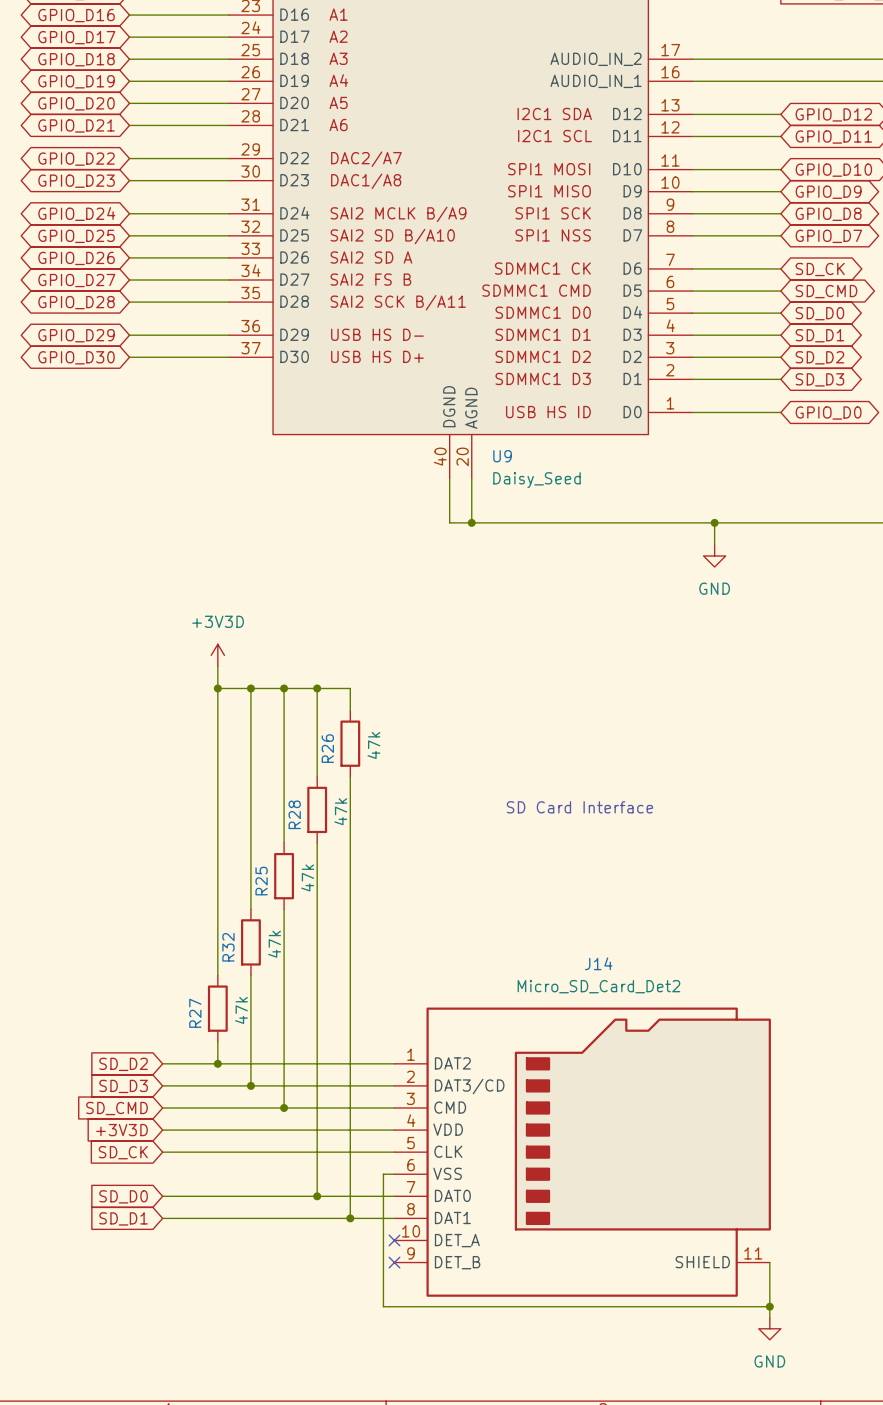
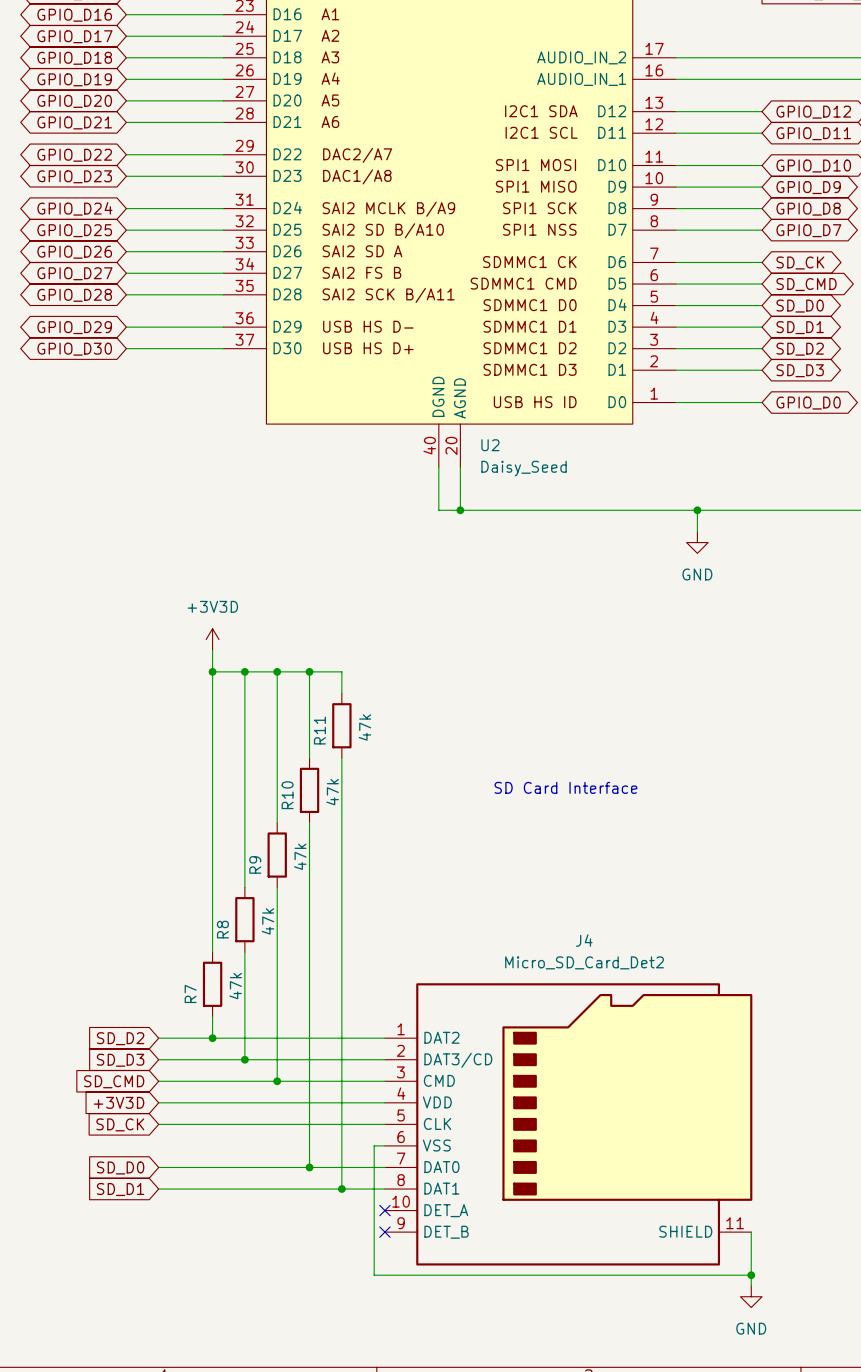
U9 name: U9 (502, 456) -> U2 (490, 445)
R26 name: R26 (327, 748) -> R11 (319, 730)
R28 name: R28 (294, 814) -> R10 (287, 795)
R25 name: R25 (261, 881) -> R9 (255, 864)
R32 name: R32 (228, 947) -> R8 (222, 929)
J14 name: J14 (598, 963) -> J4 (584, 940)
R27 name: R27 (195, 1013) -> R7 (190, 993)

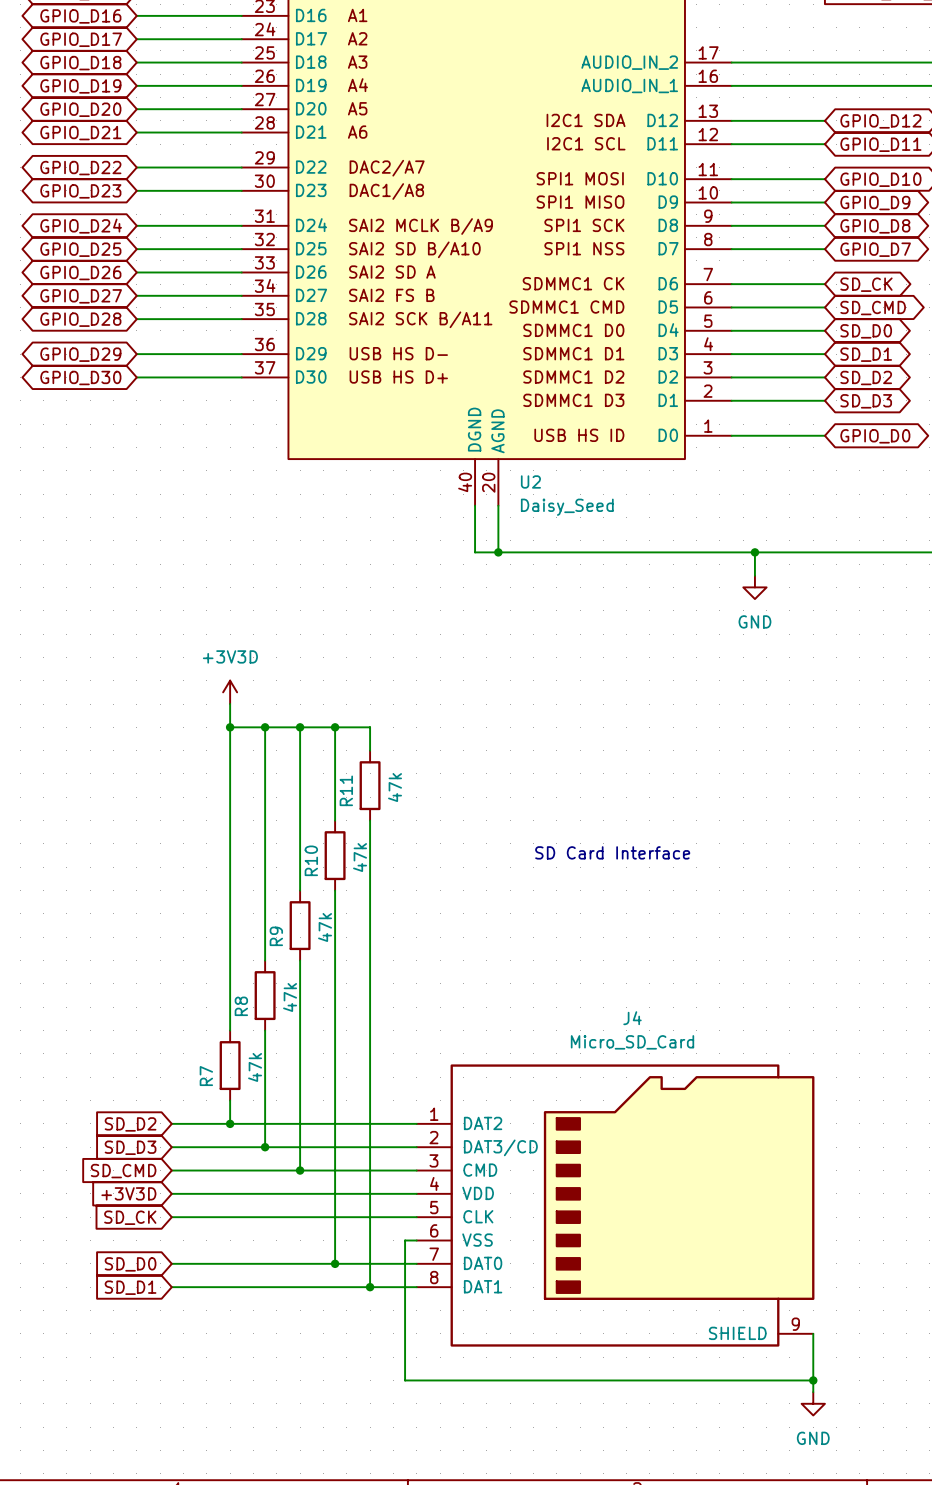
J4 value: Micro_SD_Card_Det2 (584, 962) -> Micro_SD_Card (632, 1042)
J4 symbol: [384, 983, 753, 1266] -> [416, 1064, 815, 1347]
no-connect mark: (384, 1210) -> none
no-connect mark: (384, 1232) -> none

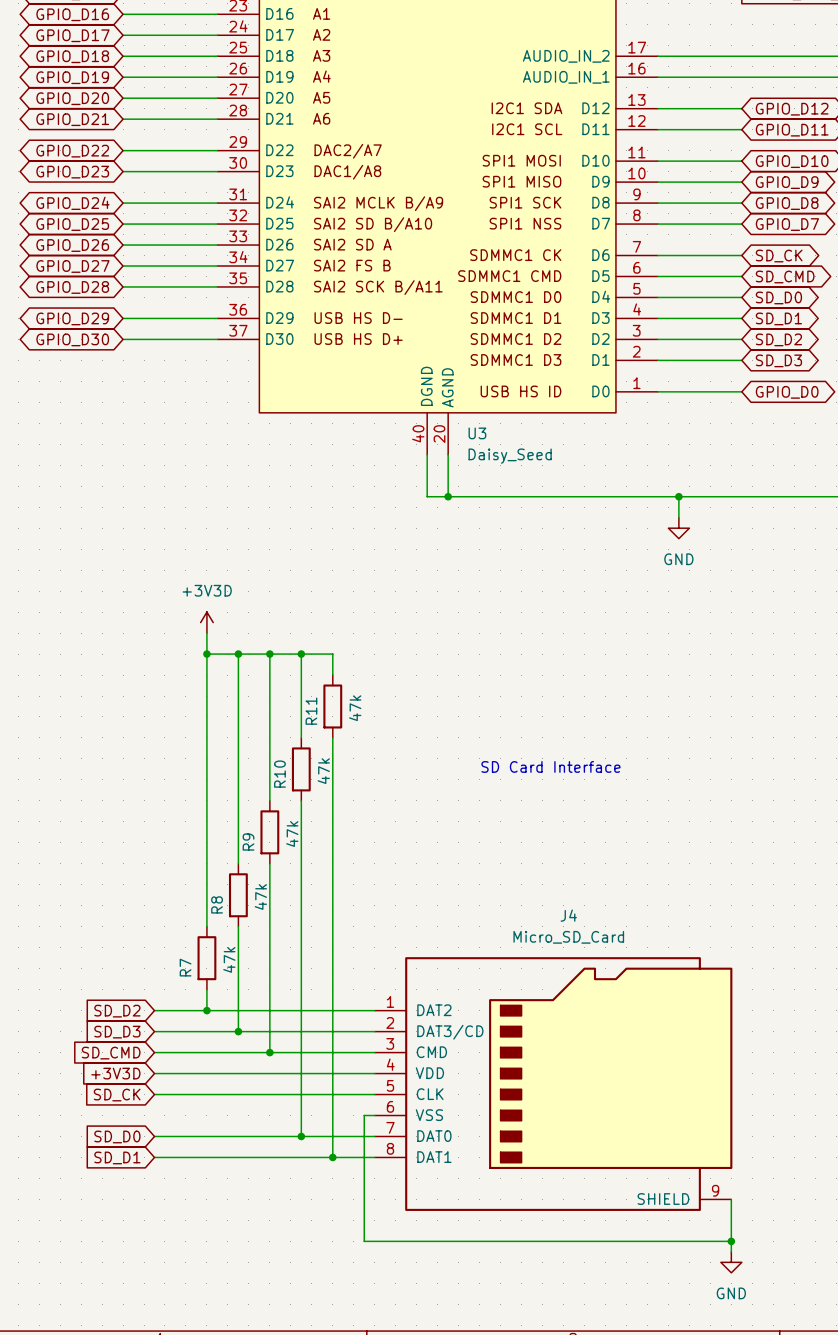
U2 name: U2 (530, 481) -> U3 (477, 433)

